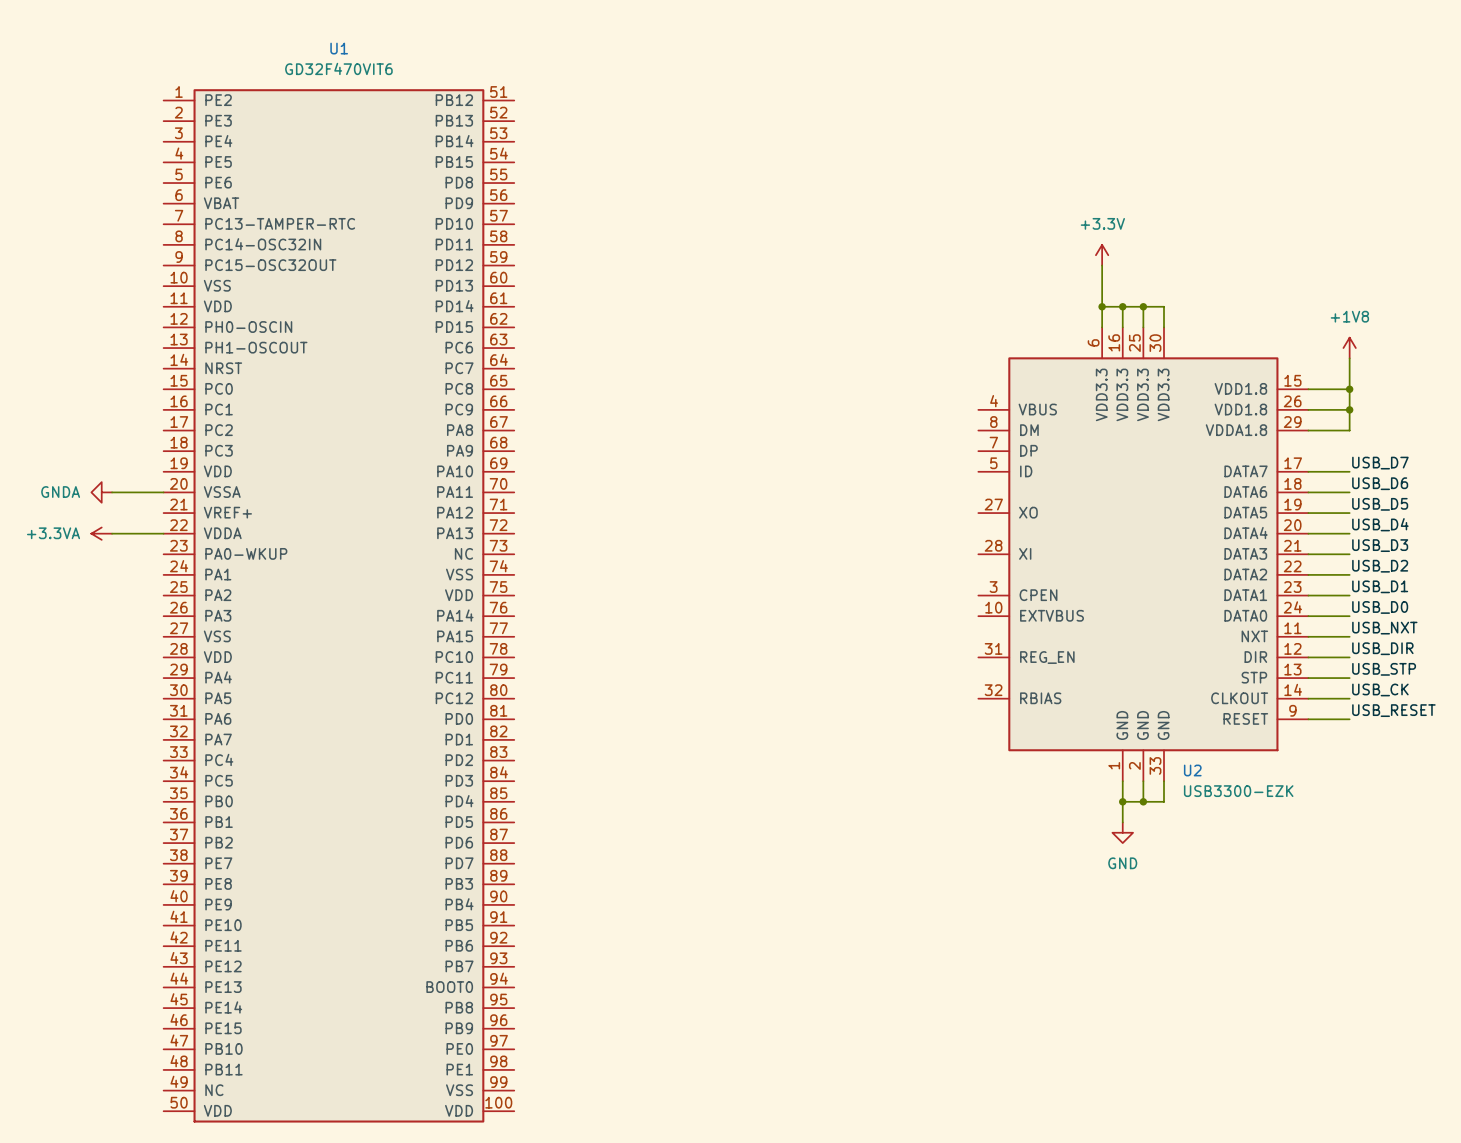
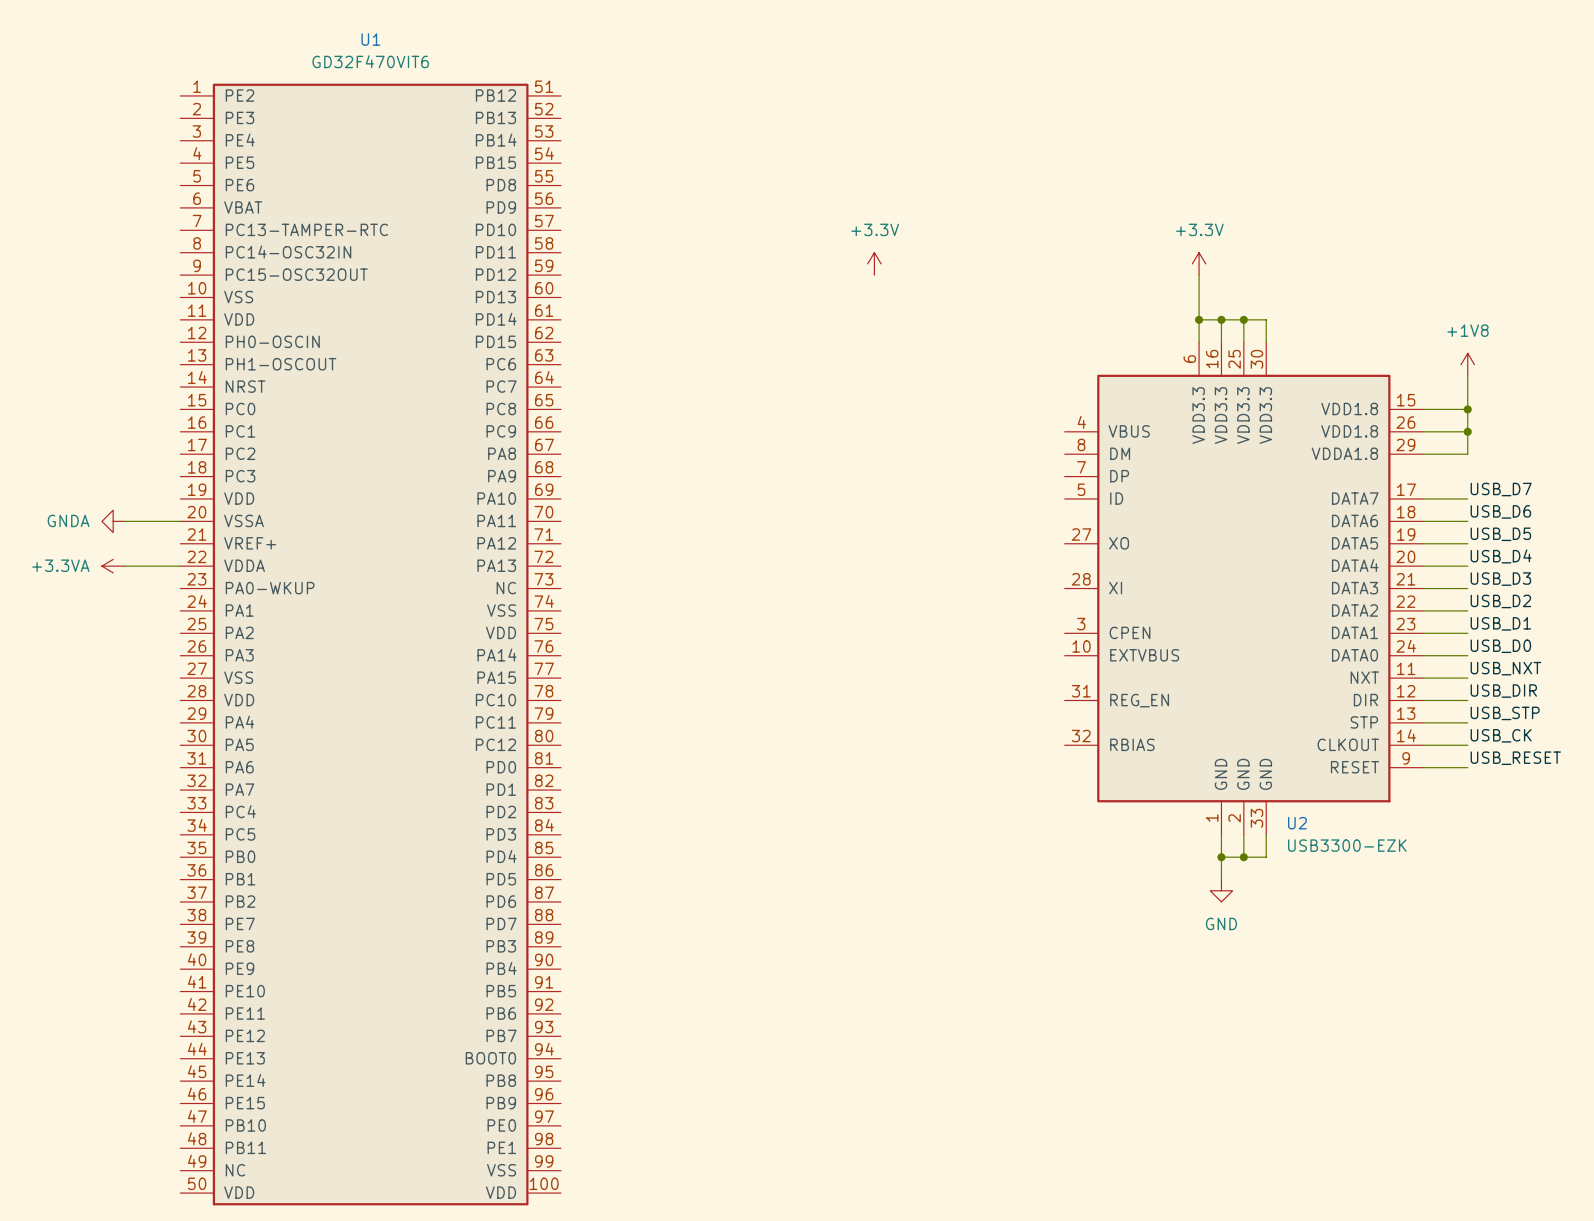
power symbol: none -> +3.3V (874, 263)

